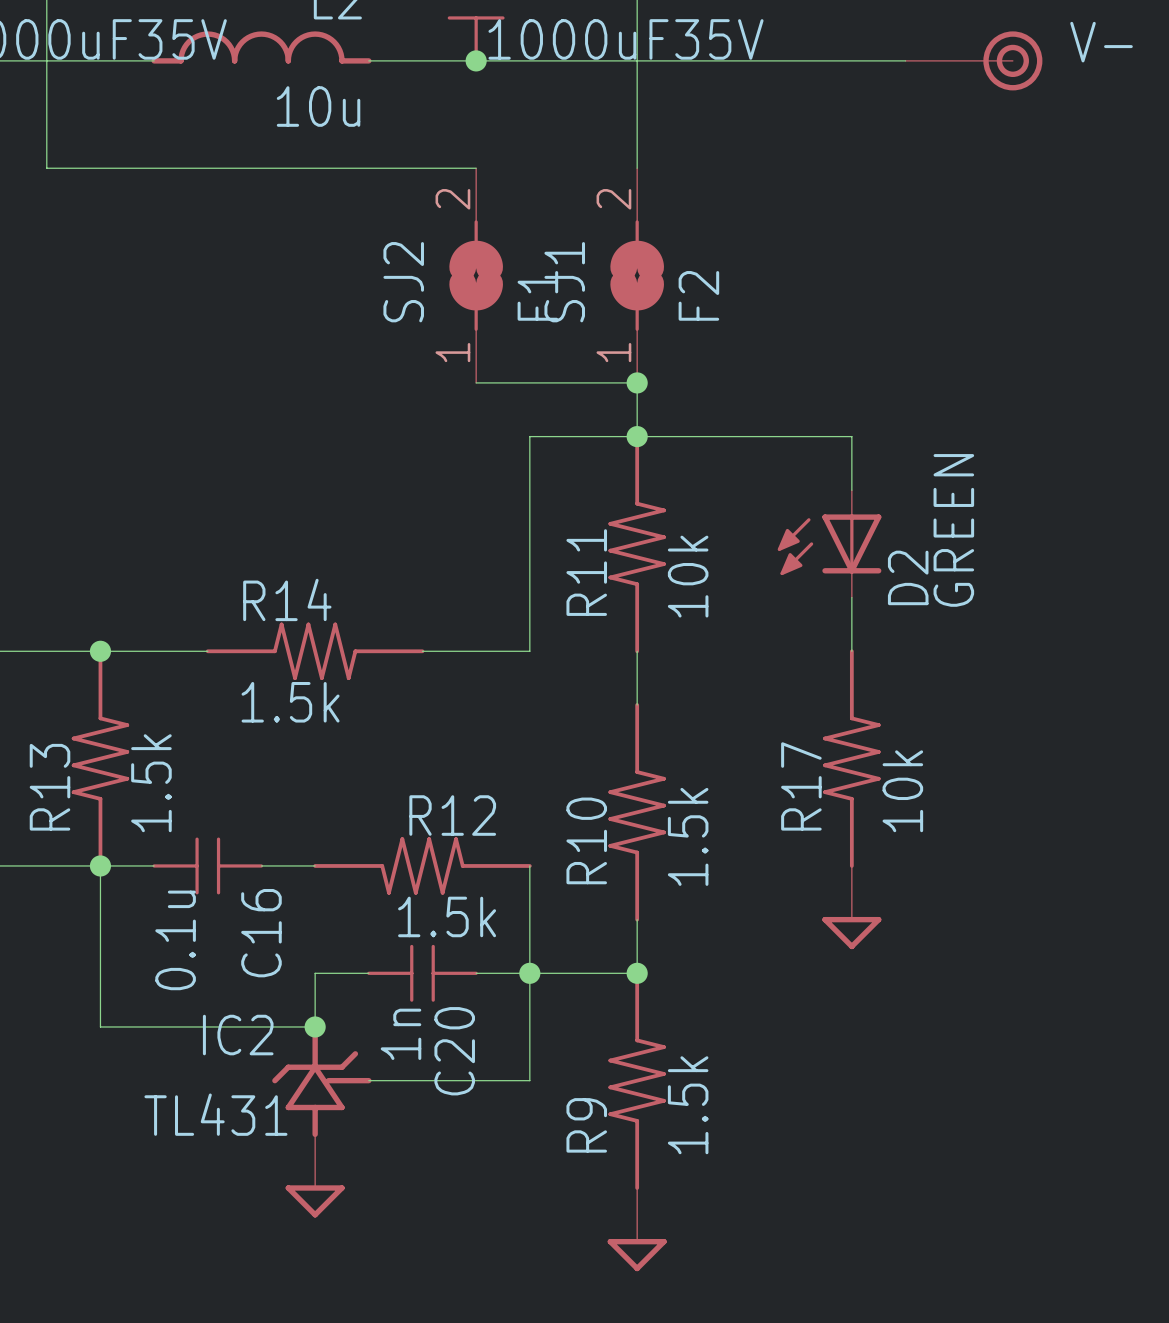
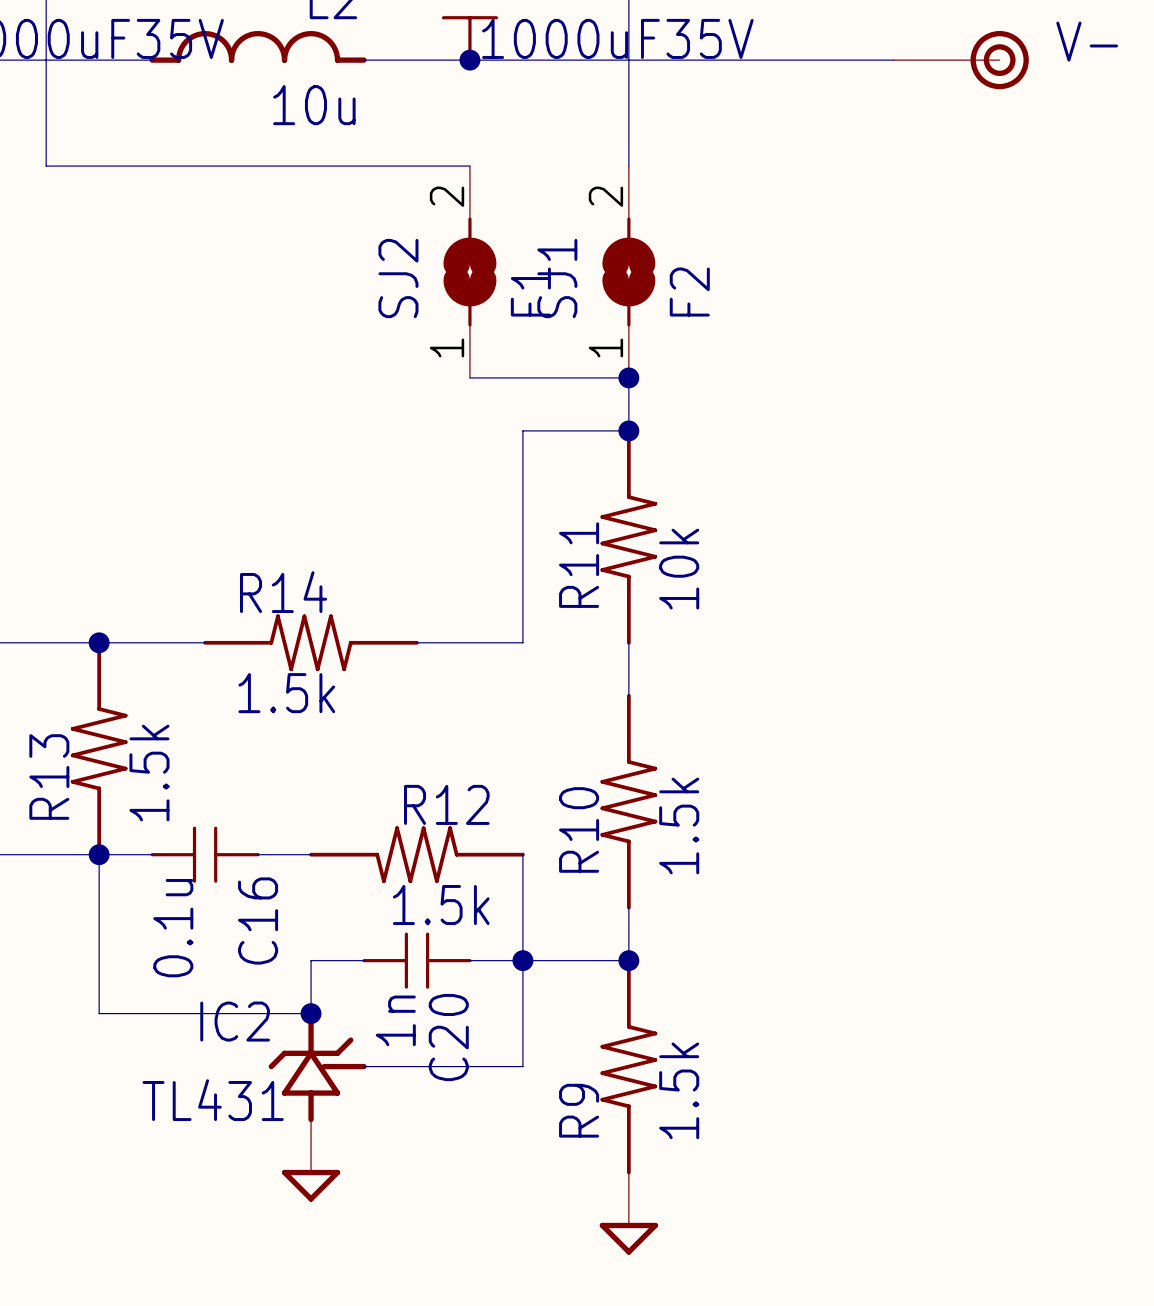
wire: (637, 436) (851, 436) (851, 490) -> none
D2: GREEN (829, 543) -> none
wire: (851, 597) (851, 651) -> none
R17: 10k (851, 758) -> none
power symbol: (851, 907) -> none

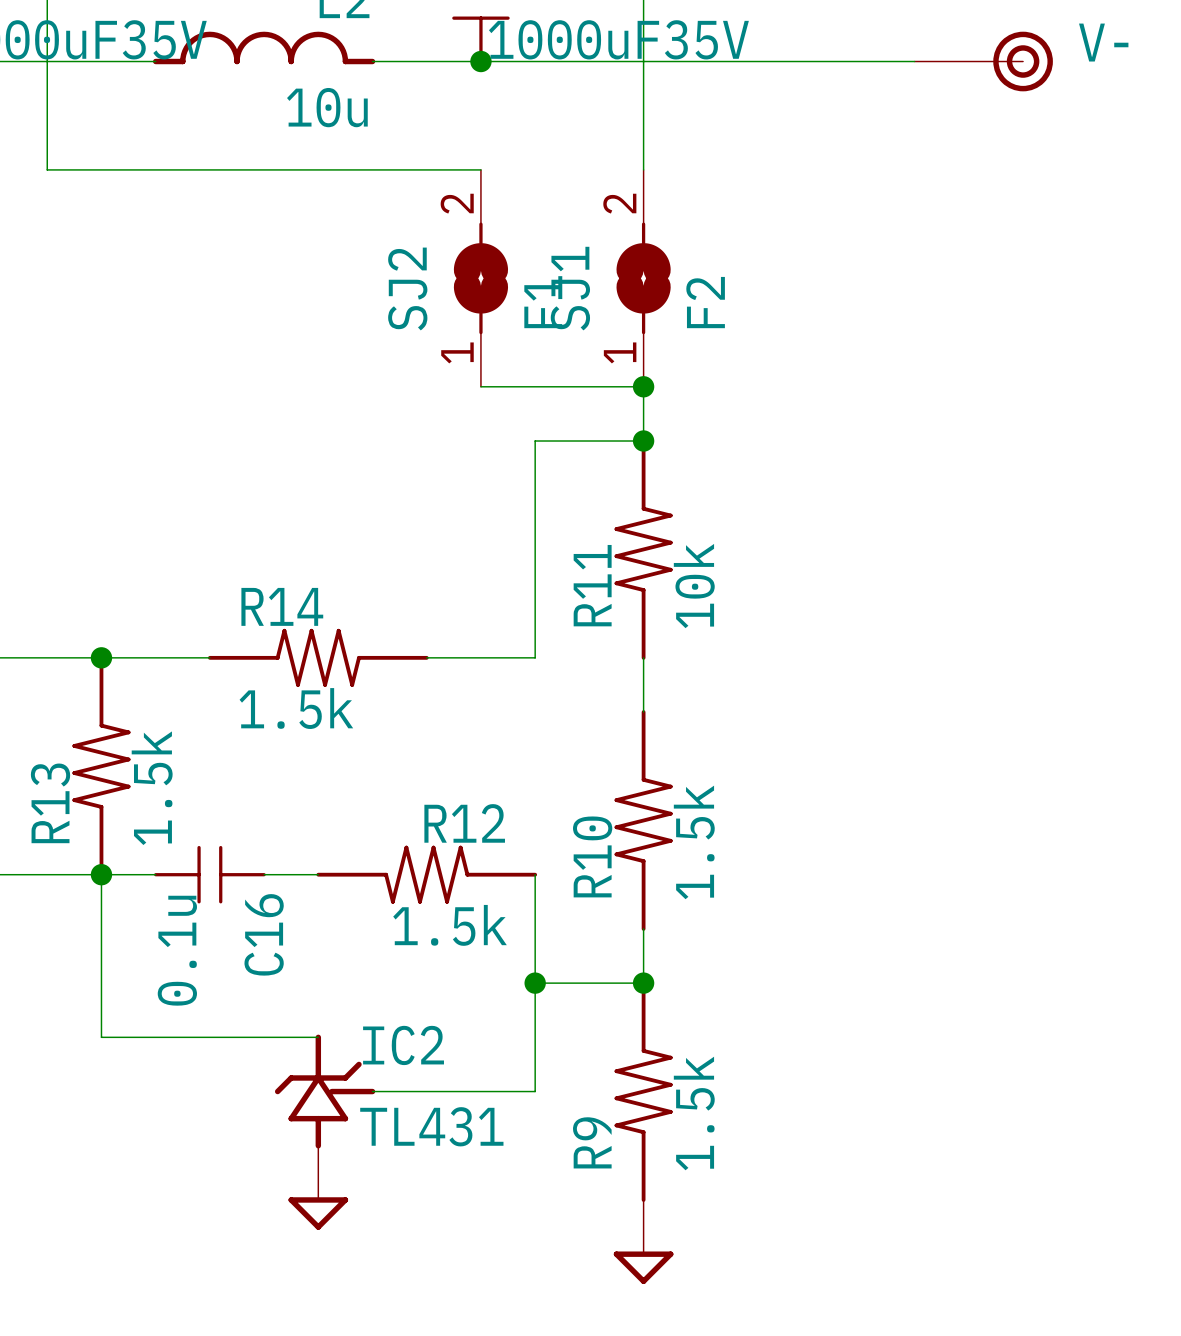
wire: (364, 960) (311, 960) (311, 1013) -> none
C20: 1n (416, 960) -> none
wire: (469, 960) (522, 960) -> none
junction: (311, 1013) -> none
IC2 name position: IC2 (235, 1021) -> IC2 (403, 1045)
IC2 value position: TL431 (213, 1100) -> TL431 (431, 1126)

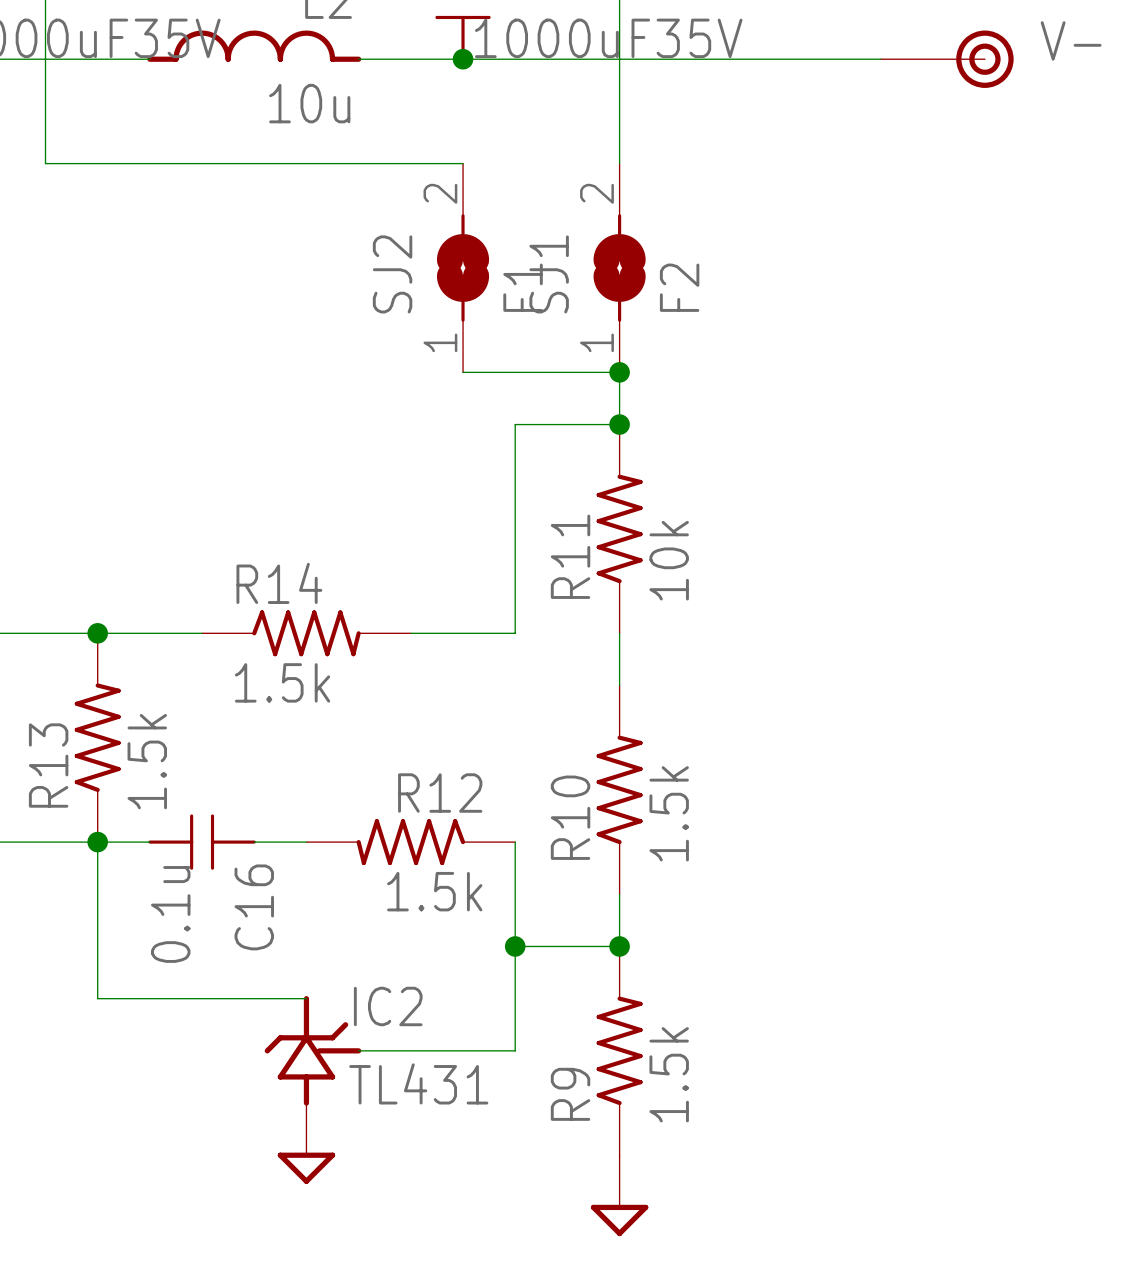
R11 symbol: [614, 439, 673, 660] -> [596, 424, 643, 634]
R14 symbol: [208, 628, 429, 687] -> [202, 610, 411, 657]
R13 symbol: [72, 655, 131, 877] -> [74, 633, 121, 843]
R10 symbol: [614, 710, 673, 931] -> [596, 685, 643, 895]
R12 symbol: [316, 845, 538, 904] -> [306, 819, 516, 866]
R9 symbol: [614, 981, 673, 1202] -> [596, 946, 643, 1156]

